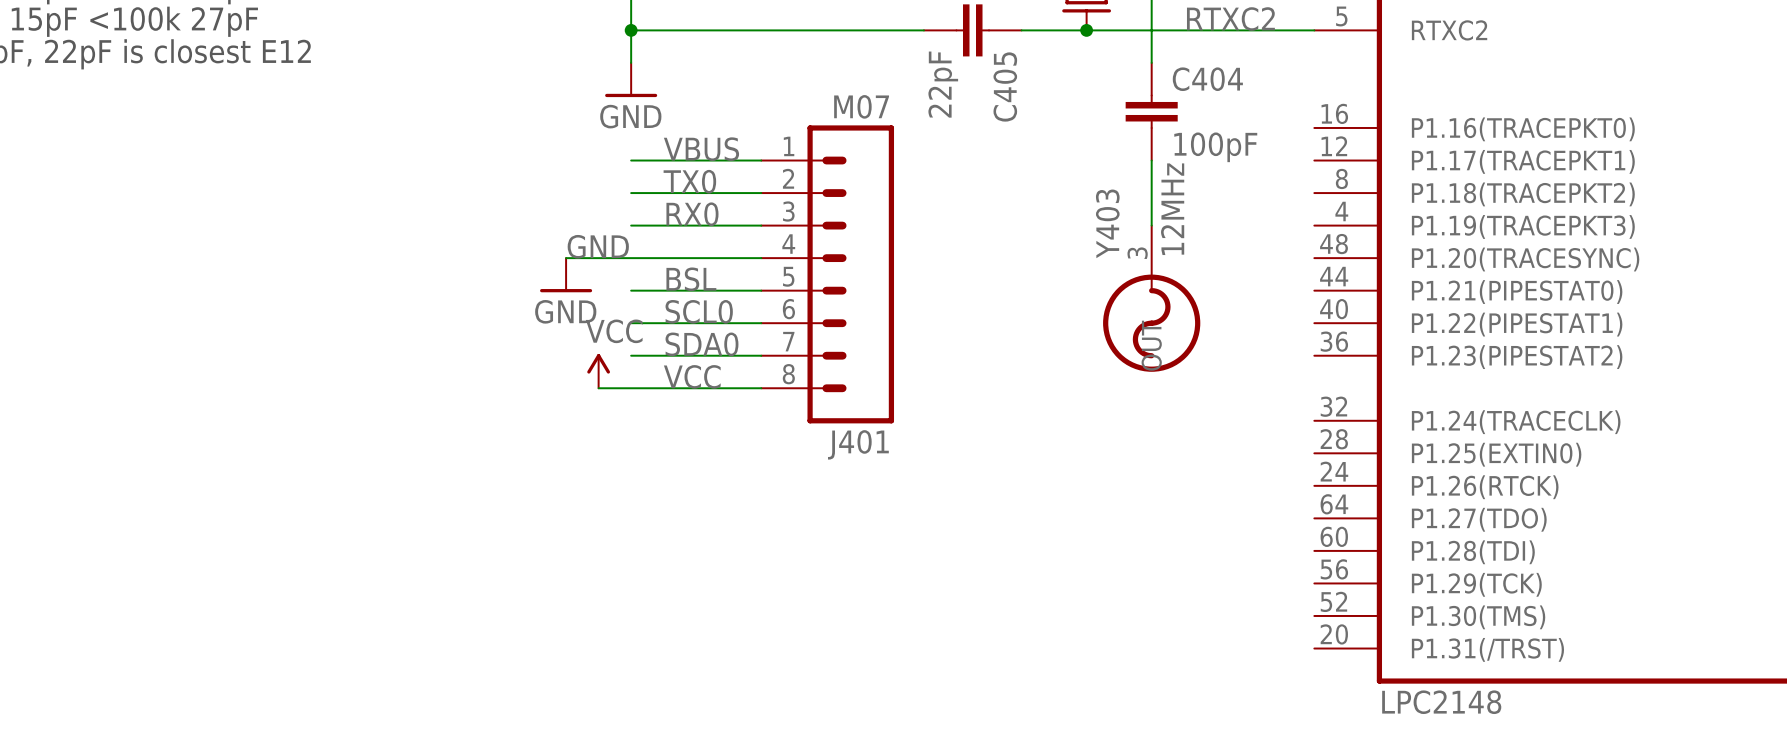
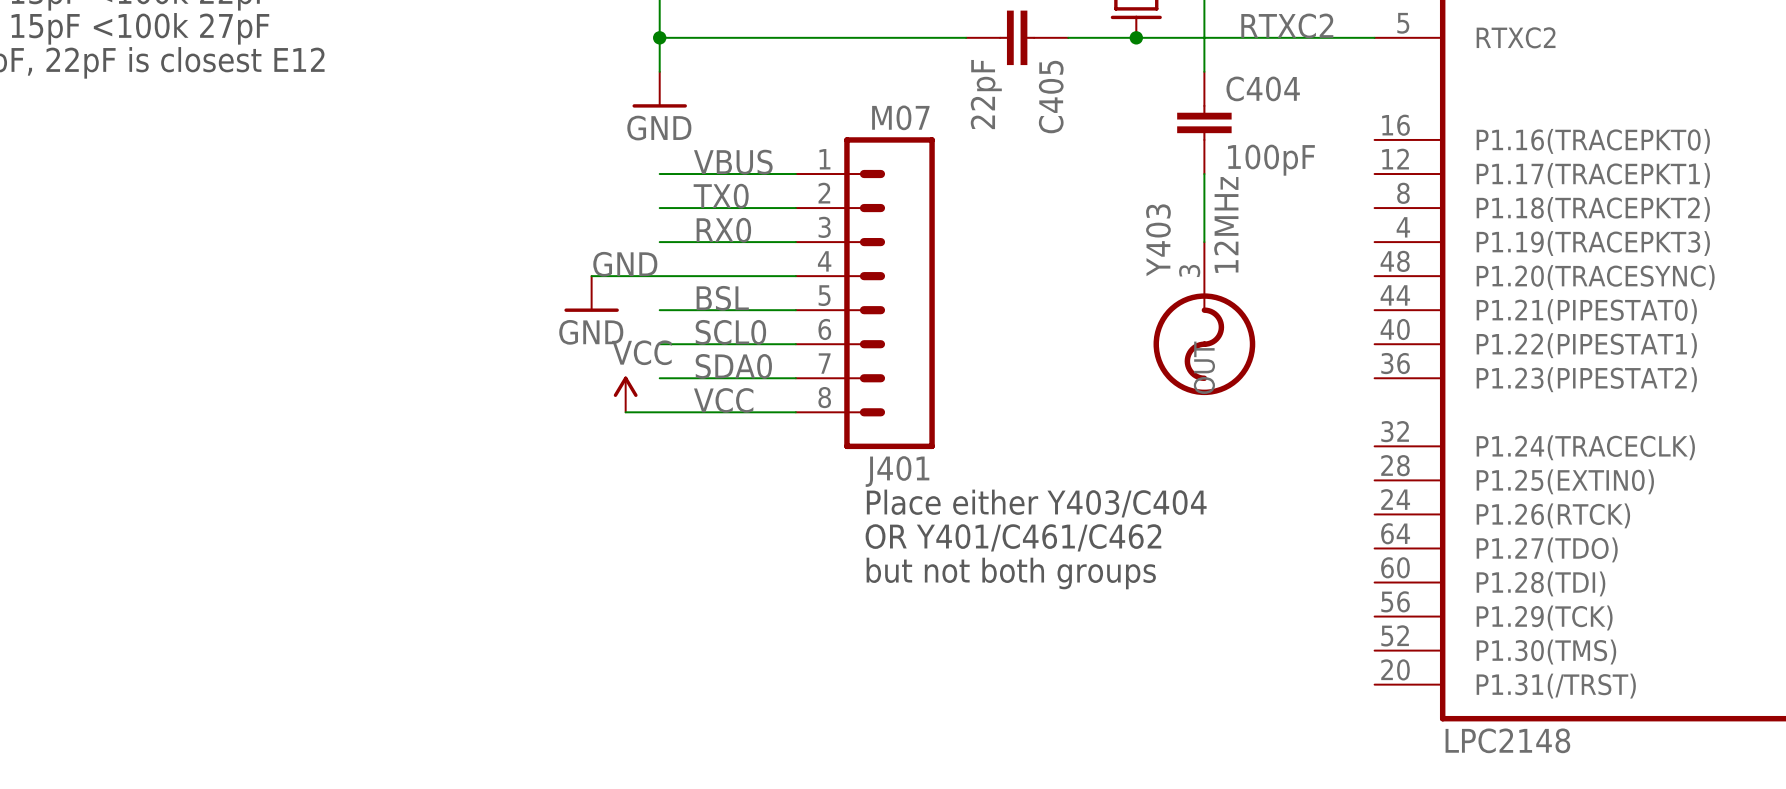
text: none -> Place either Y403/C404 (1036, 503)
text: none -> OR Y401/C461/C462 (1013, 537)
text: none -> but not both groups (1011, 573)

